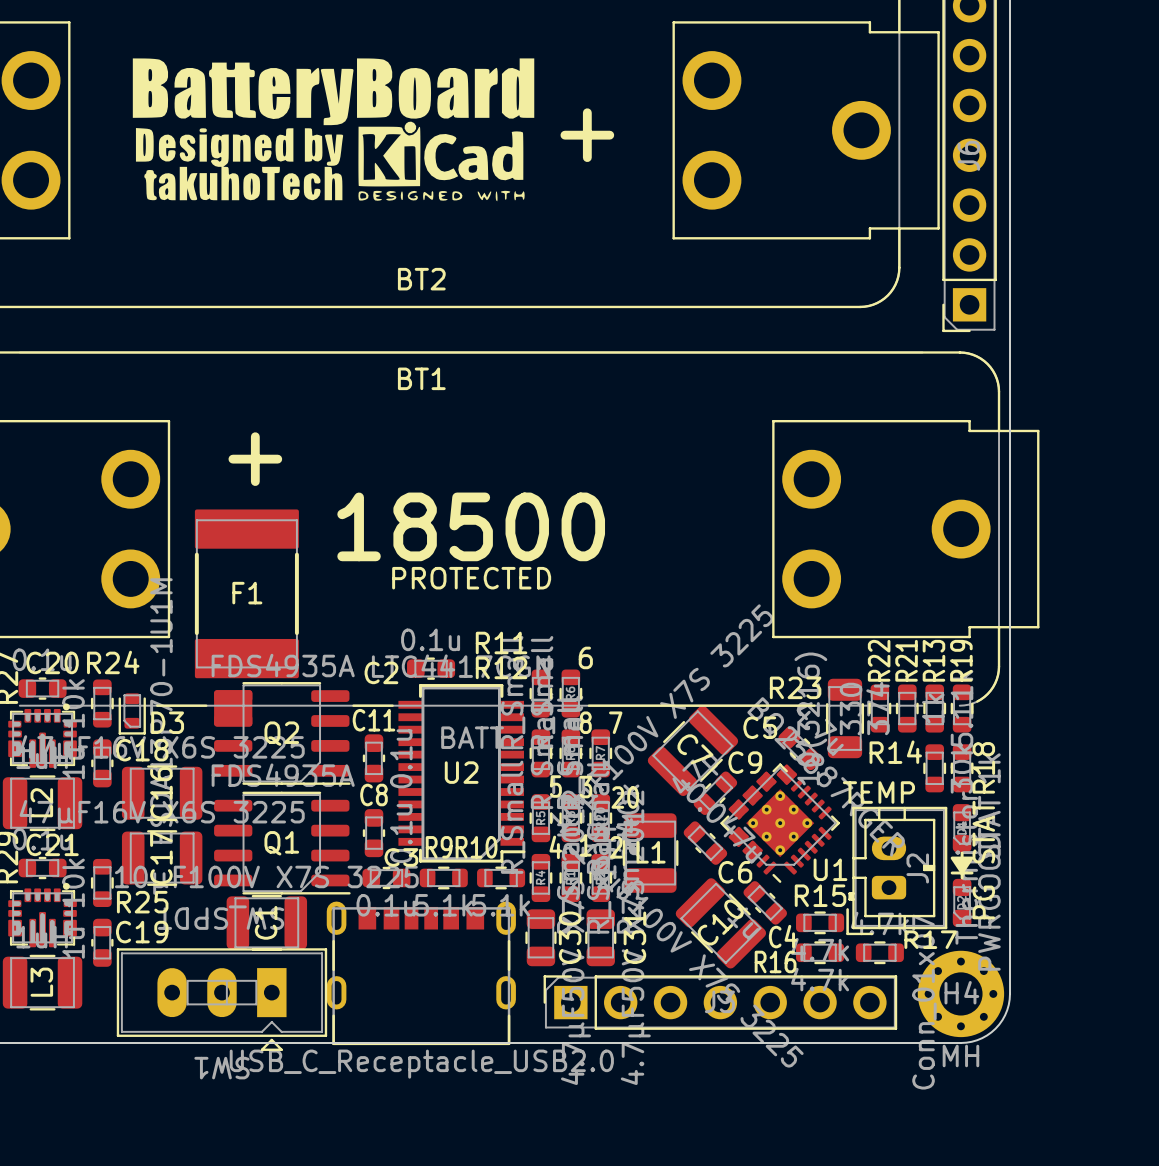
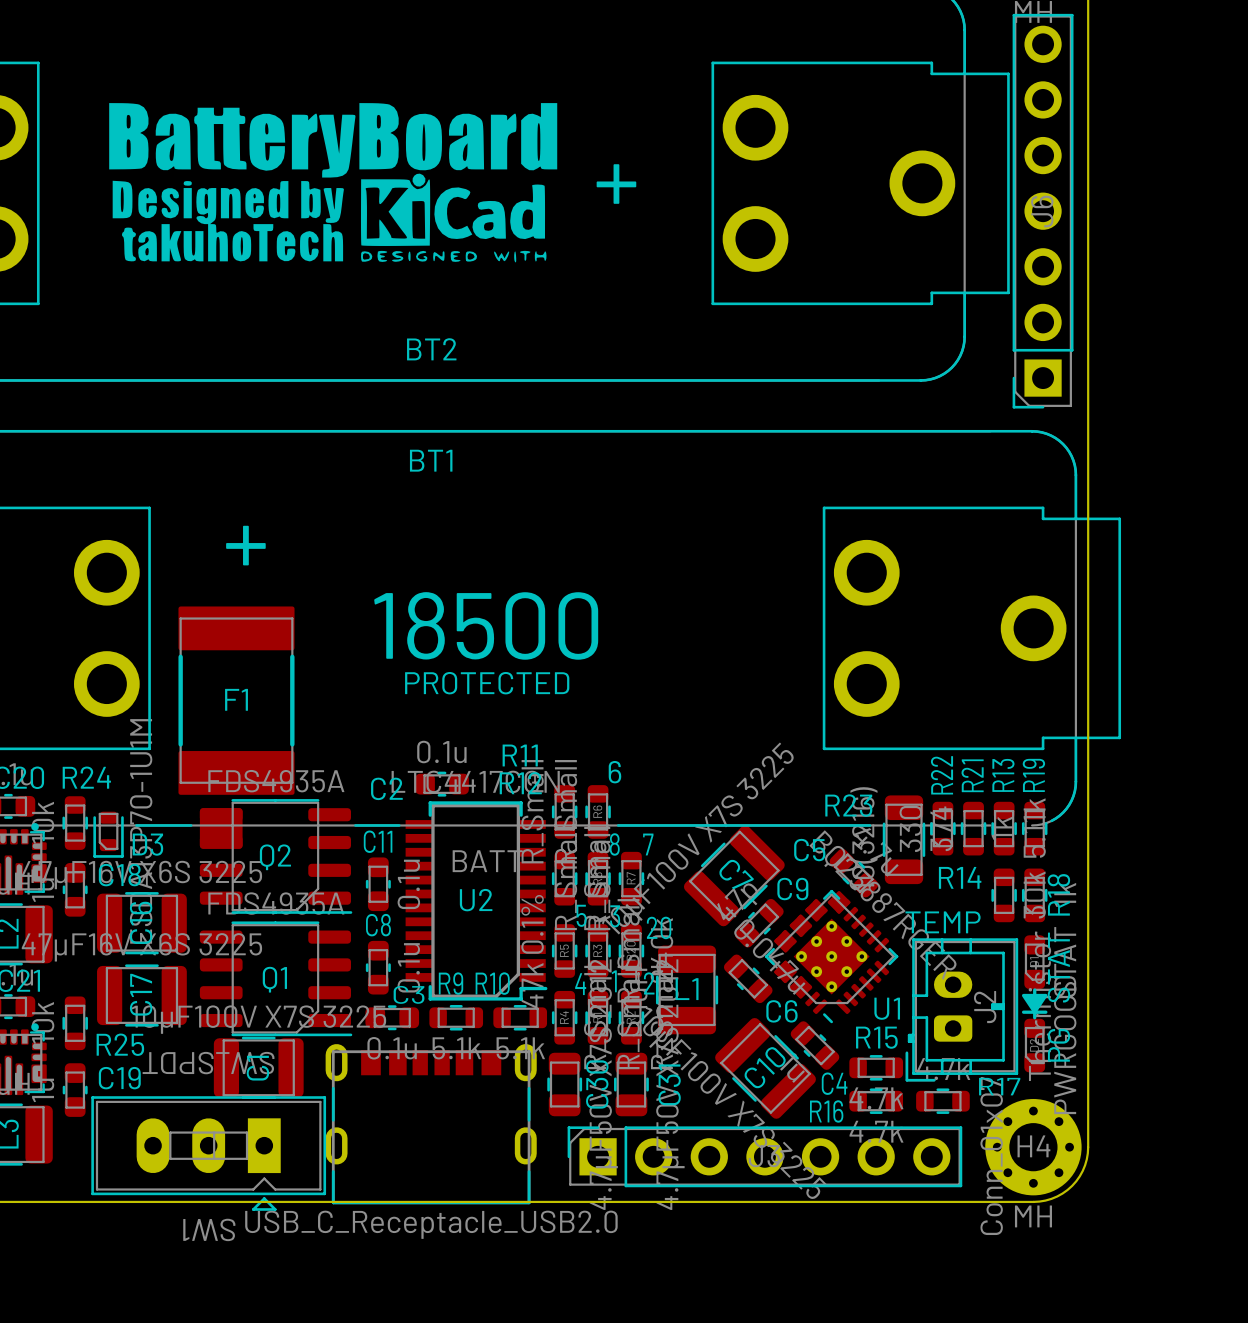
R5 value: R_Small (513, 817) -> 47k 0.1% (532, 951)

